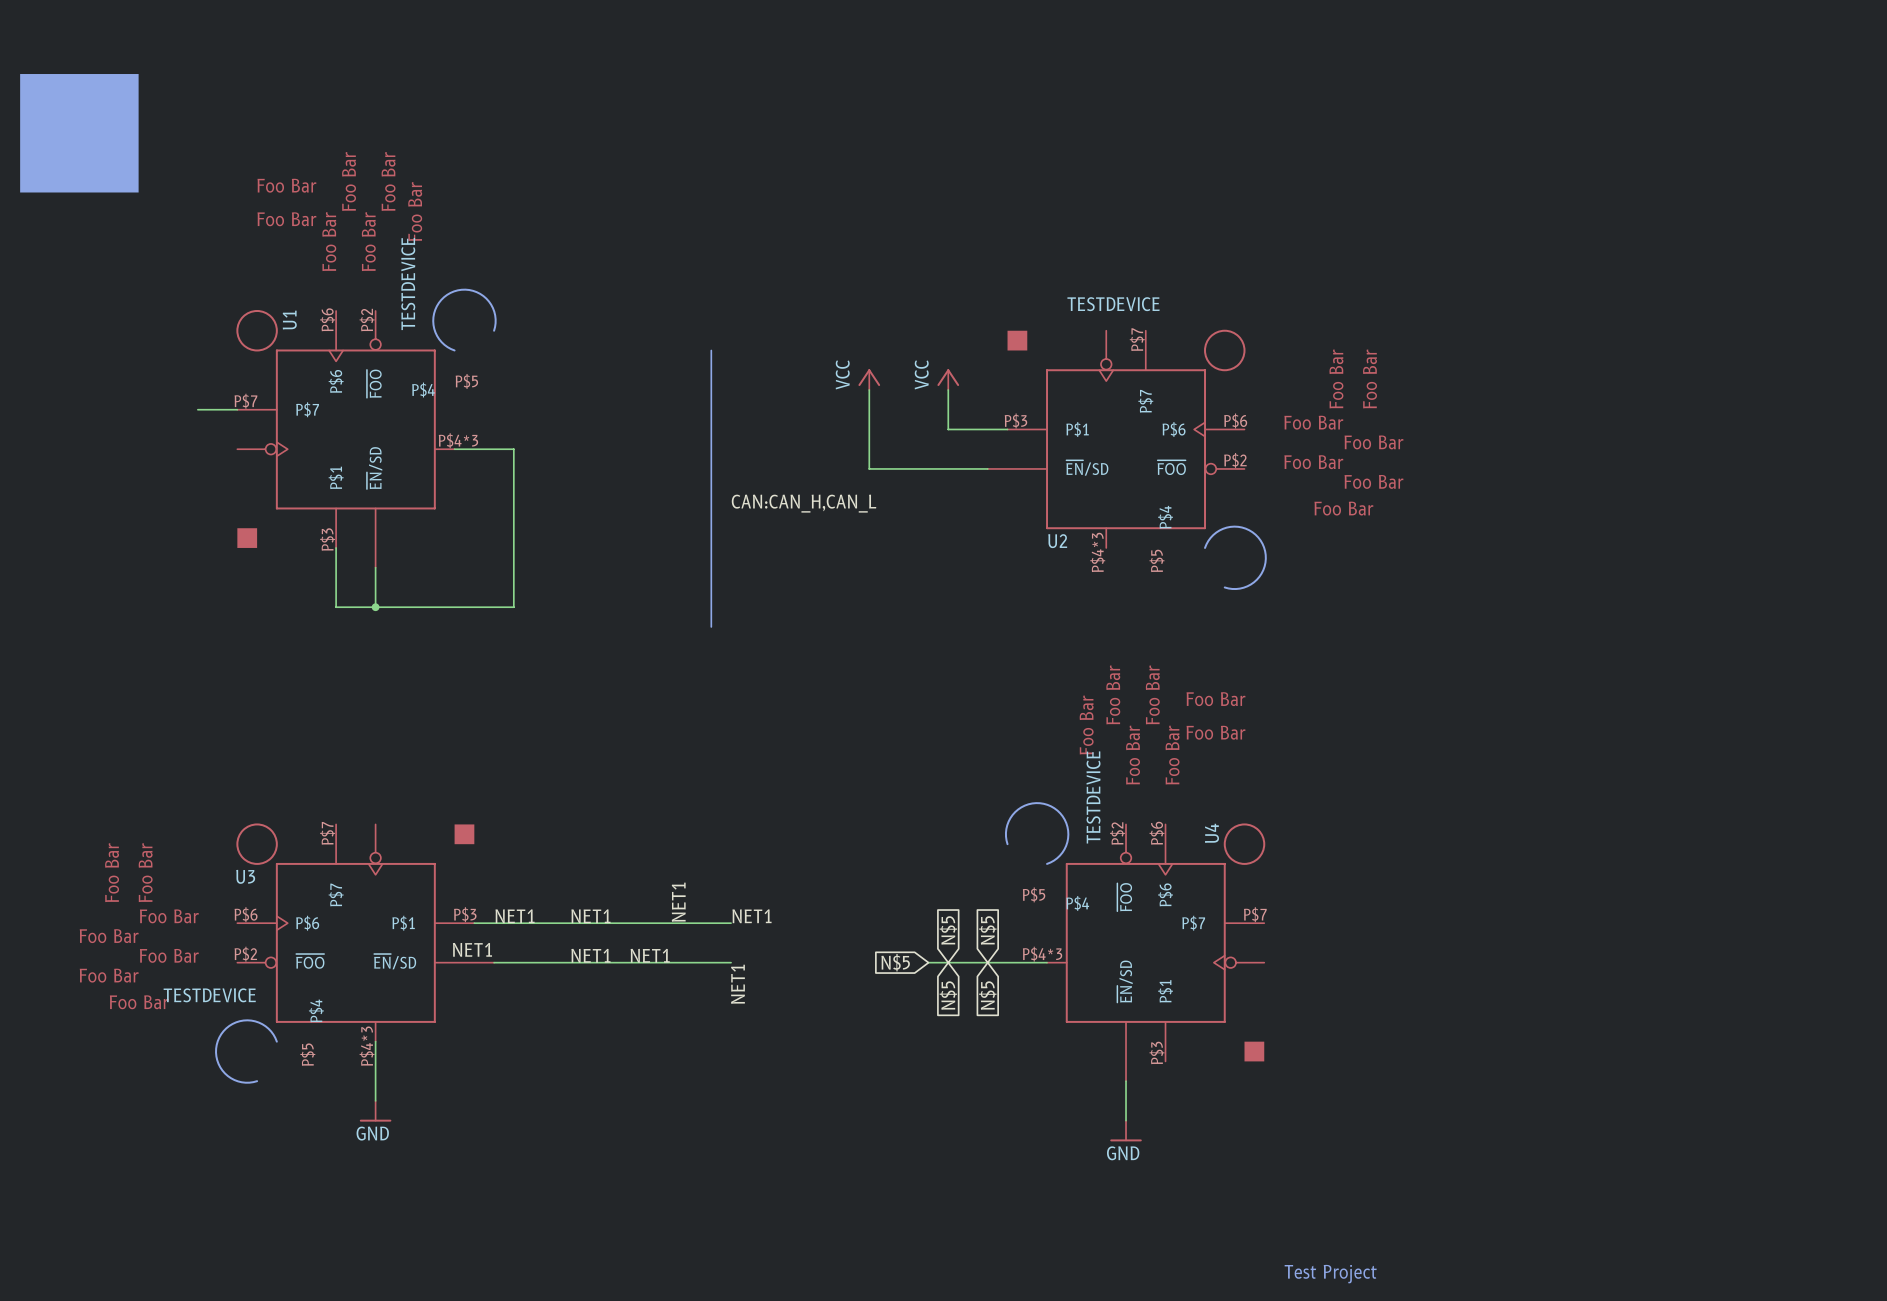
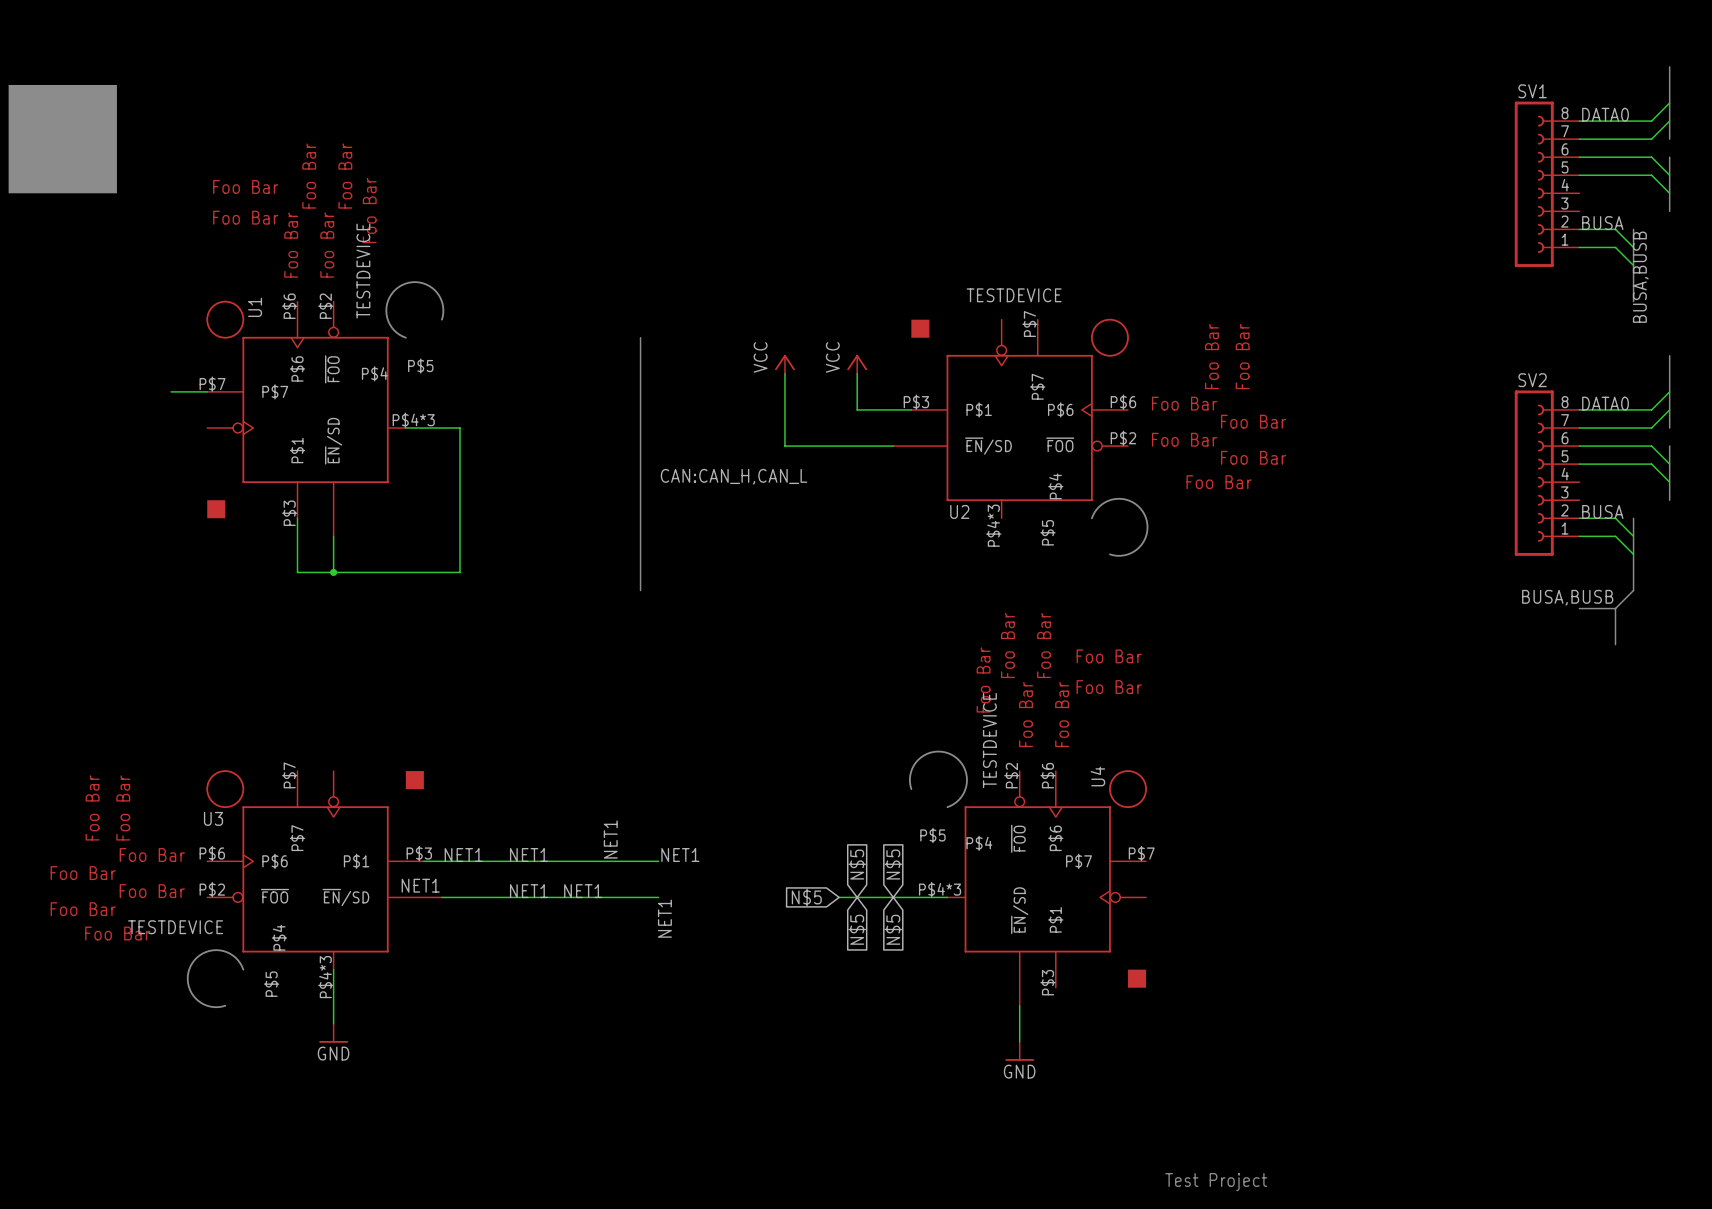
bus: none -> (1669, 66) (1669, 139)
wire: none -> (1669, 103) (1651, 121) (1579, 121)
label: none -> DATA0 (1605, 114)
wire: none -> (1669, 121) (1651, 139) (1579, 139)
wire: none -> (1579, 157) (1651, 157) (1669, 175)
bus: none -> (1669, 157) (1669, 211)
wire: none -> (1579, 175) (1651, 175) (1669, 193)
SV1: none -> (1547, 184)
label: none -> BUSA (1602, 223)
wire: none -> (1579, 229) (1615, 229) (1633, 247)
bus: none -> (1633, 229) (1633, 301)
wire: none -> (1579, 247) (1615, 247) (1633, 265)
label: none -> BUSA,BUSB (1640, 277)
bus: none -> (1669, 355) (1669, 428)
wire: none -> (1669, 391) (1651, 409) (1579, 409)
label: none -> DATA0 (1605, 403)
wire: none -> (1669, 409) (1651, 428) (1579, 428)
wire: none -> (1579, 446) (1651, 446) (1669, 464)
bus: none -> (1669, 446) (1669, 500)
wire: none -> (1579, 464) (1651, 464) (1669, 482)
SV2: none -> (1547, 473)
label: none -> BUSA (1602, 511)
wire: none -> (1579, 518) (1615, 518) (1633, 536)
bus: none -> (1633, 518) (1633, 590) (1615, 608)
wire: none -> (1579, 536) (1615, 536) (1633, 554)
label: none -> BUSA,BUSB (1567, 597)
bus: none -> (1579, 608) (1615, 608)
bus: none -> (1615, 608) (1615, 644)

